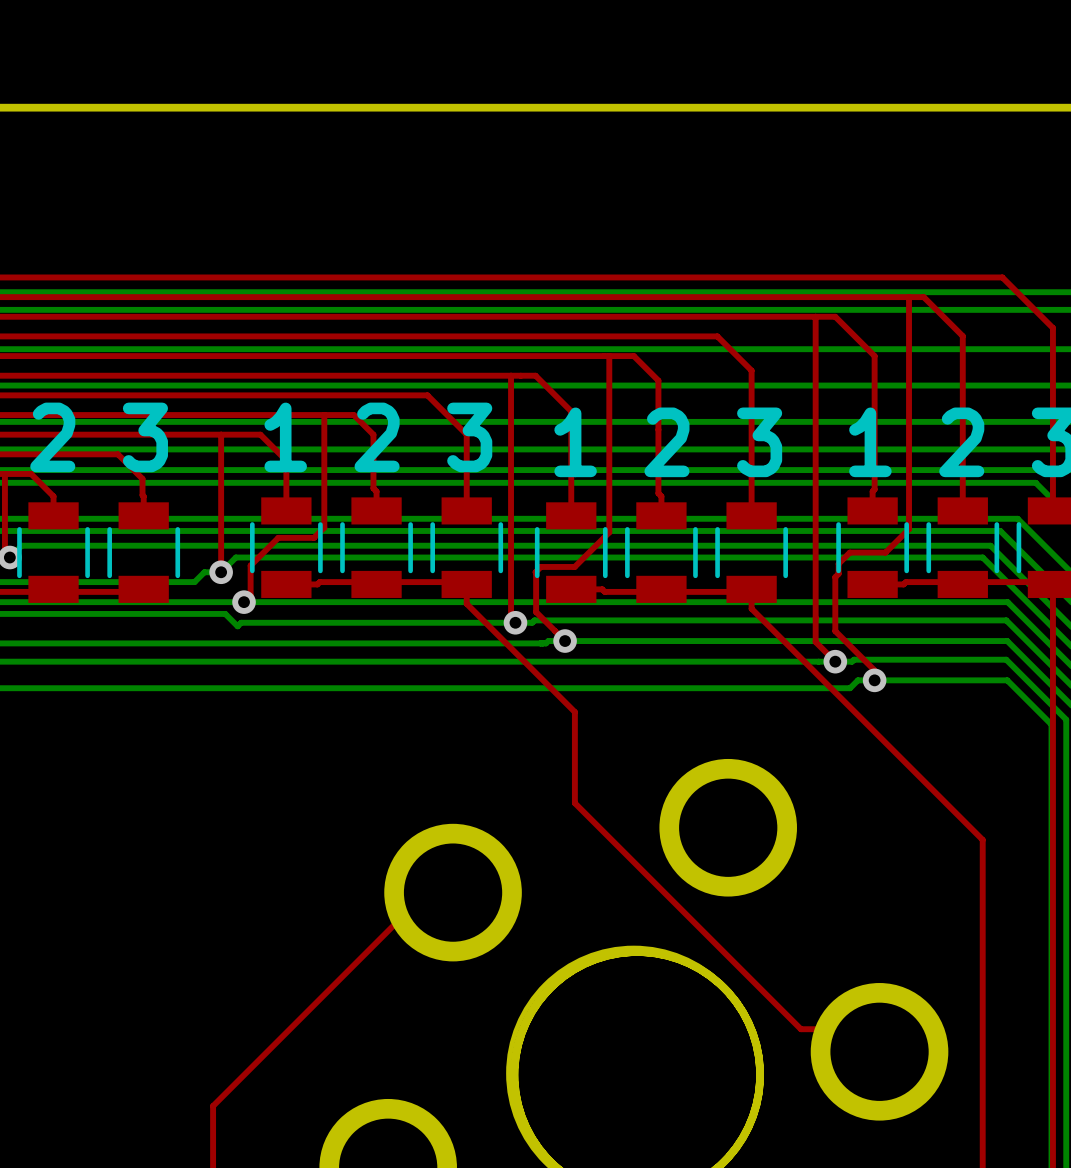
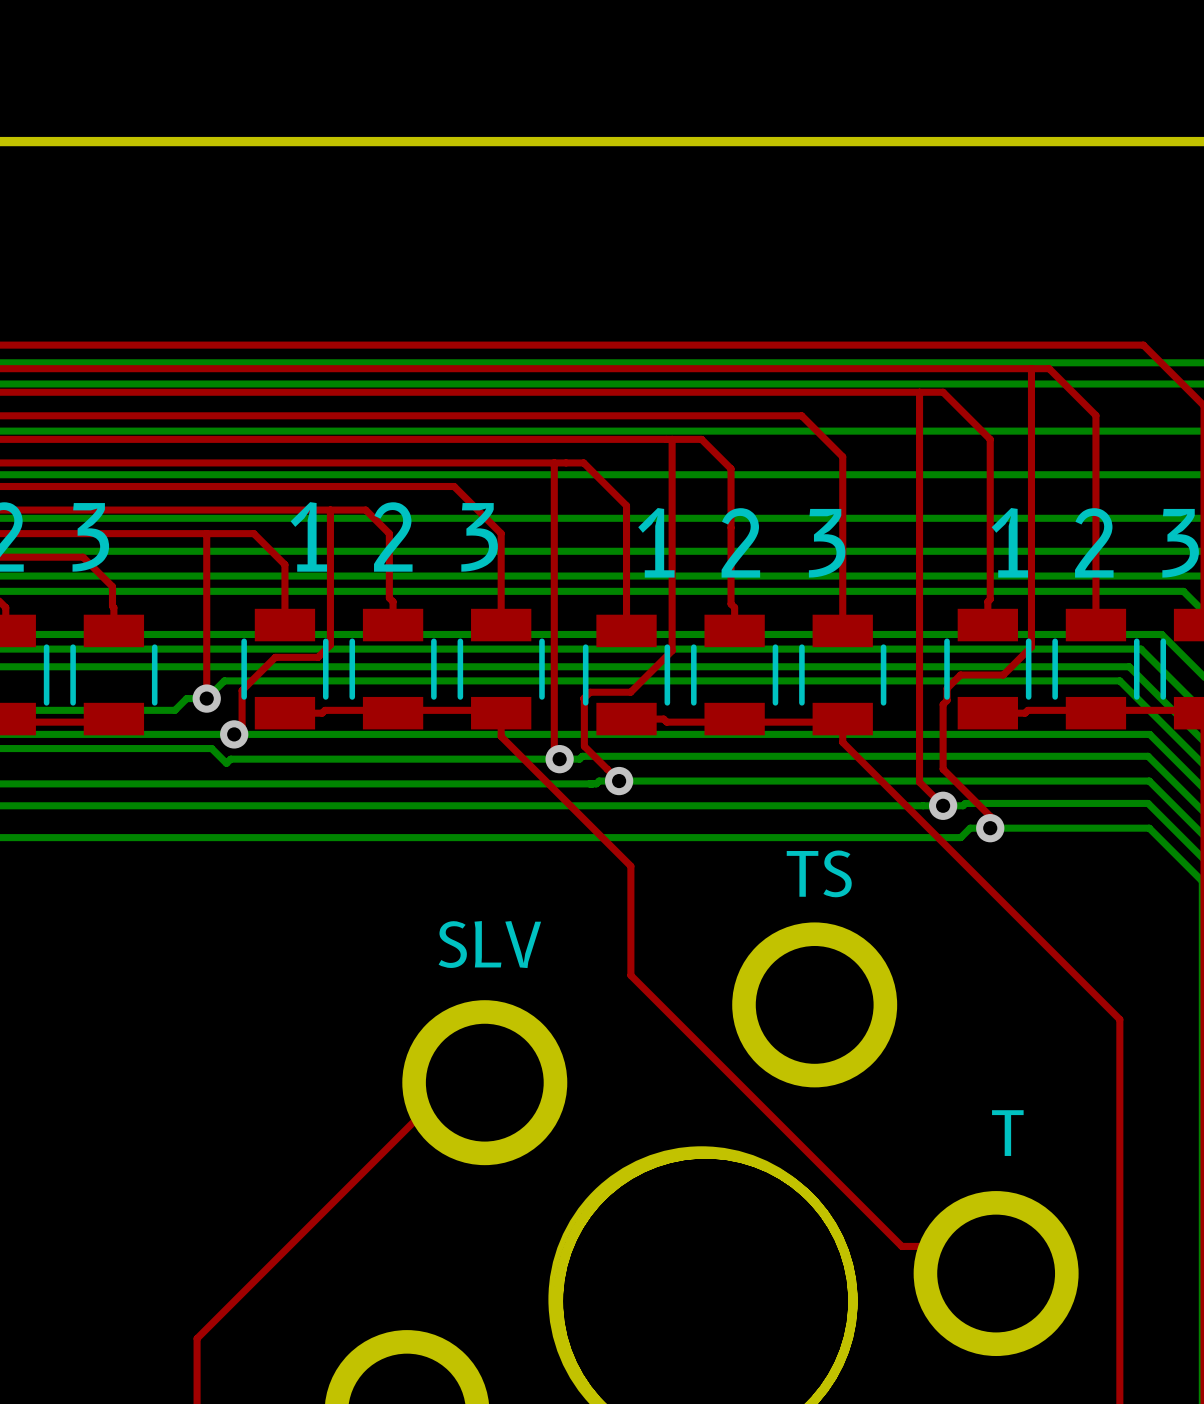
part text: none -> TS (819, 873)
part text: none -> SLV (489, 944)
part text: none -> T (1007, 1133)

